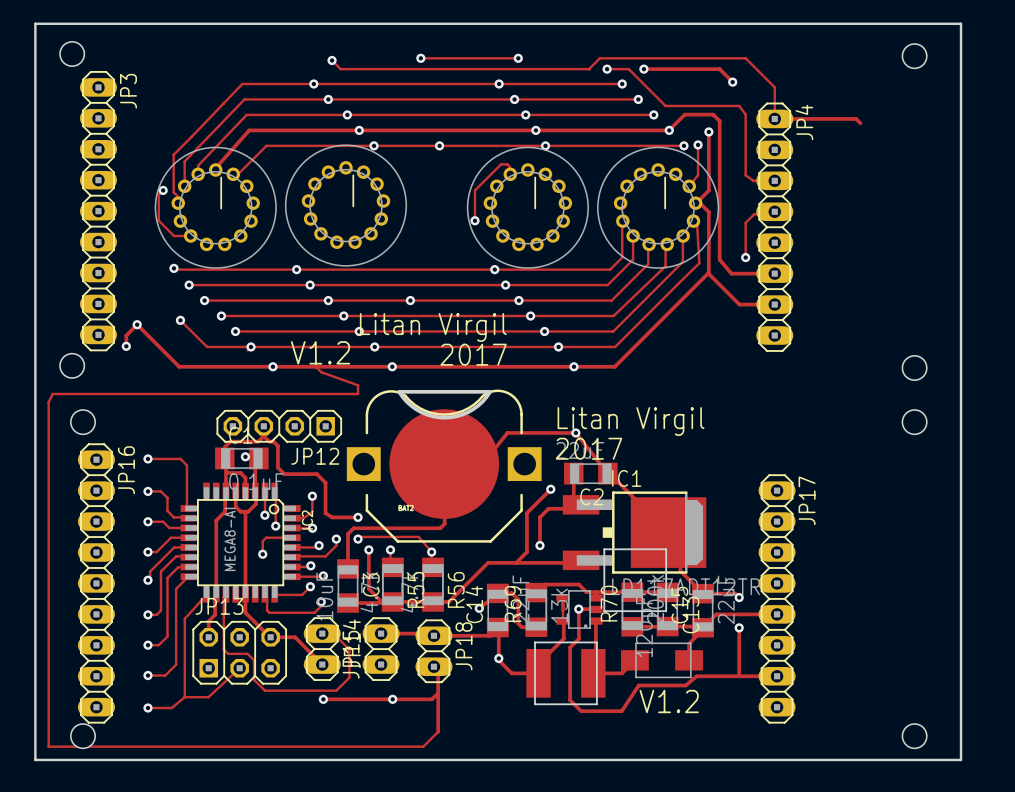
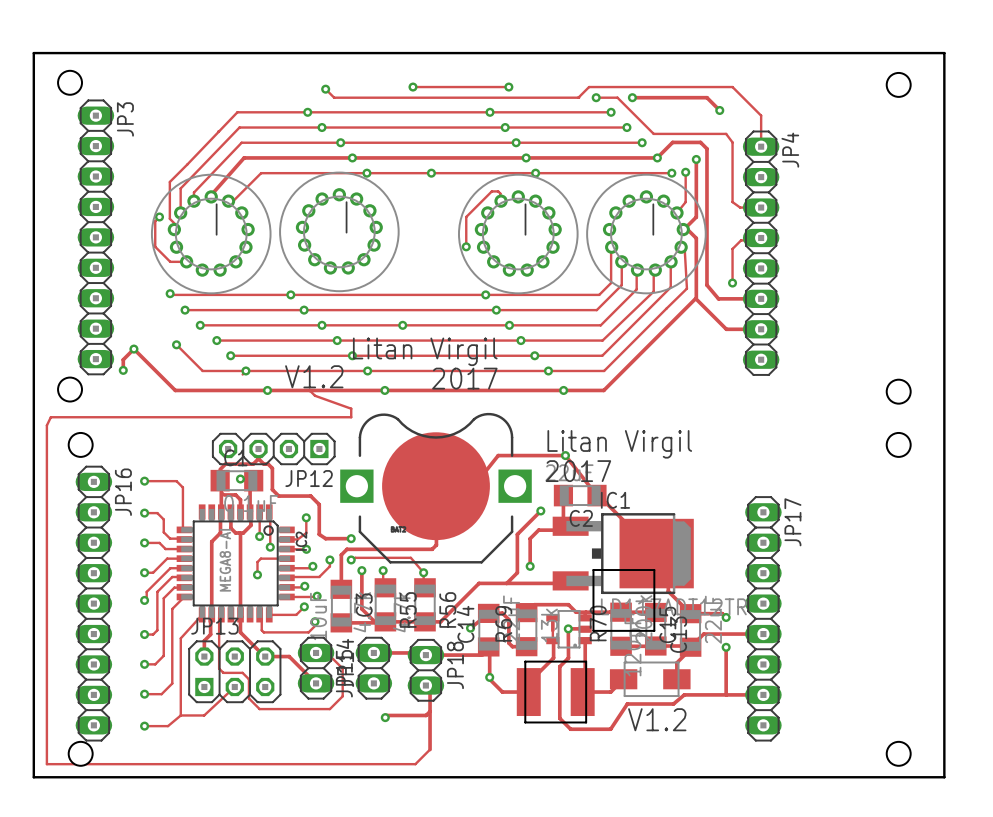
track: (774, 118) (856, 118) (860, 123) -> none
board edge: (399, 391) (490, 391) (478, 405) (468, 412) (444, 417) (421, 412) (411, 405) (399, 391) -> none
track: (434, 697) (431, 699) (323, 699) -> (426, 715) (385, 715)
via: (323, 699) -> none

